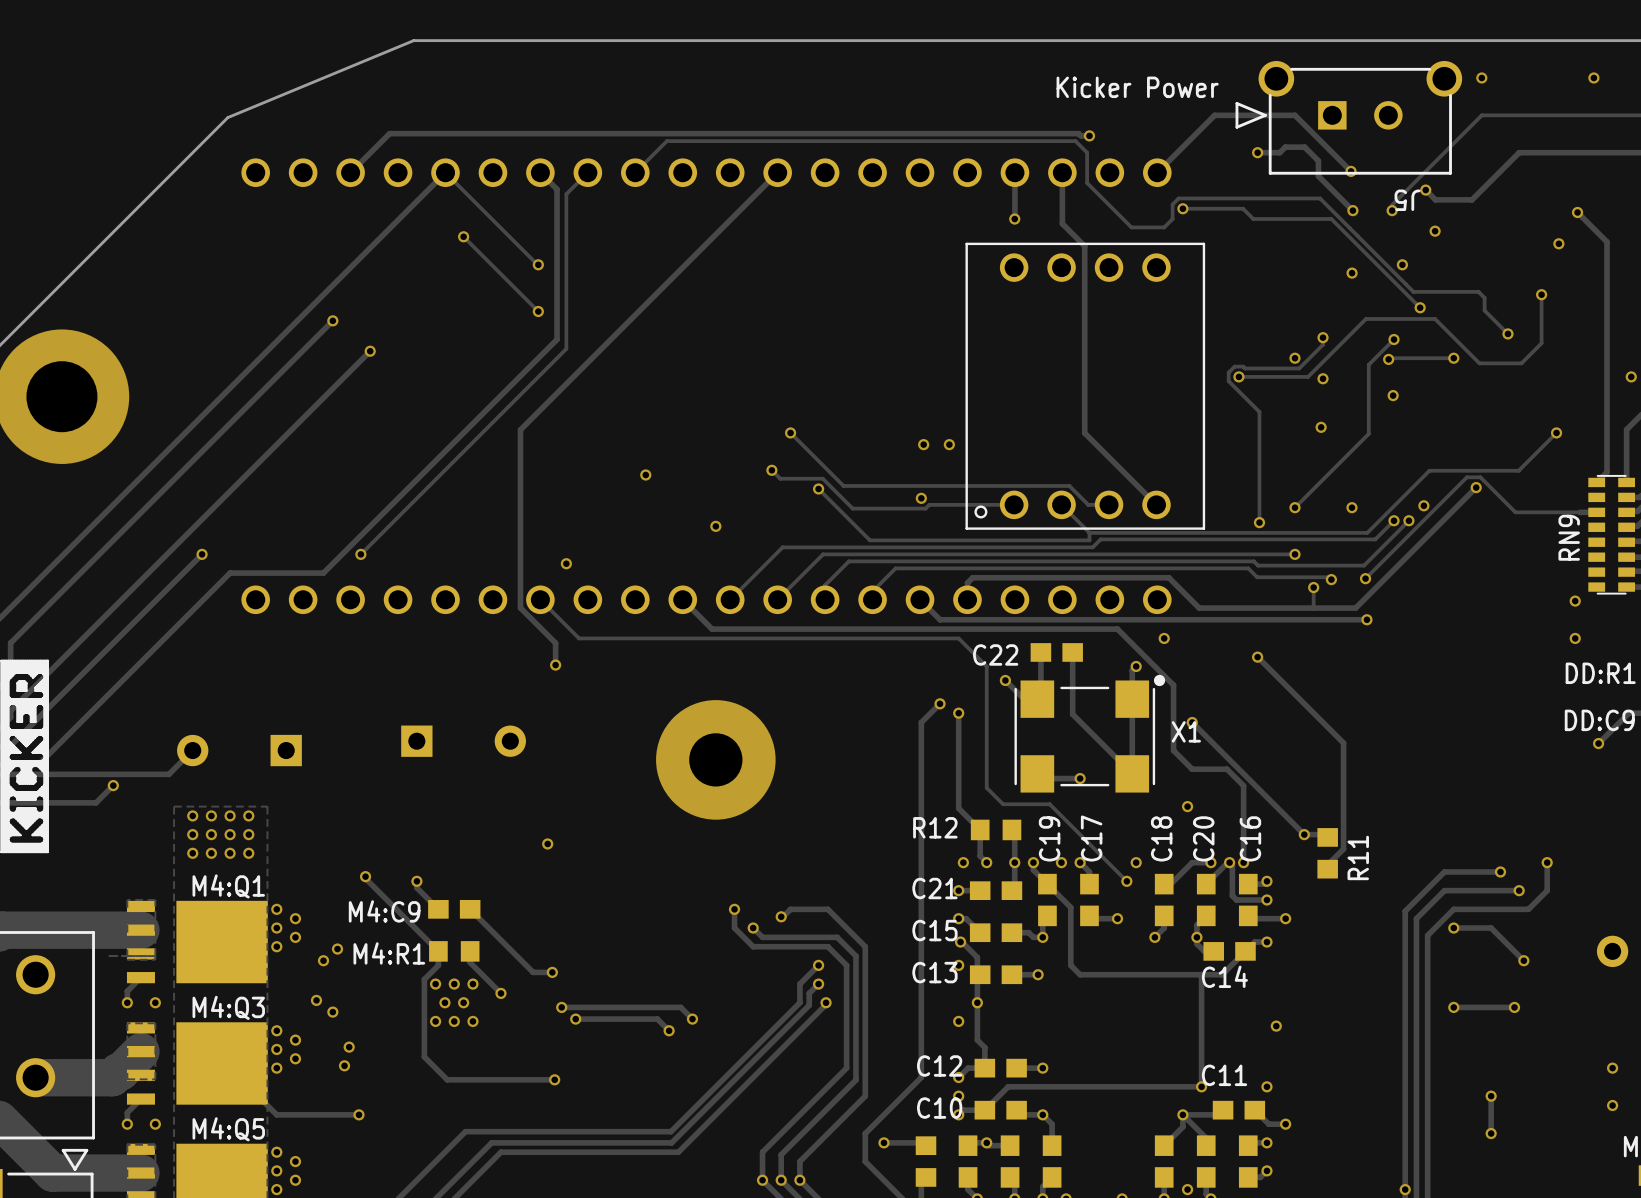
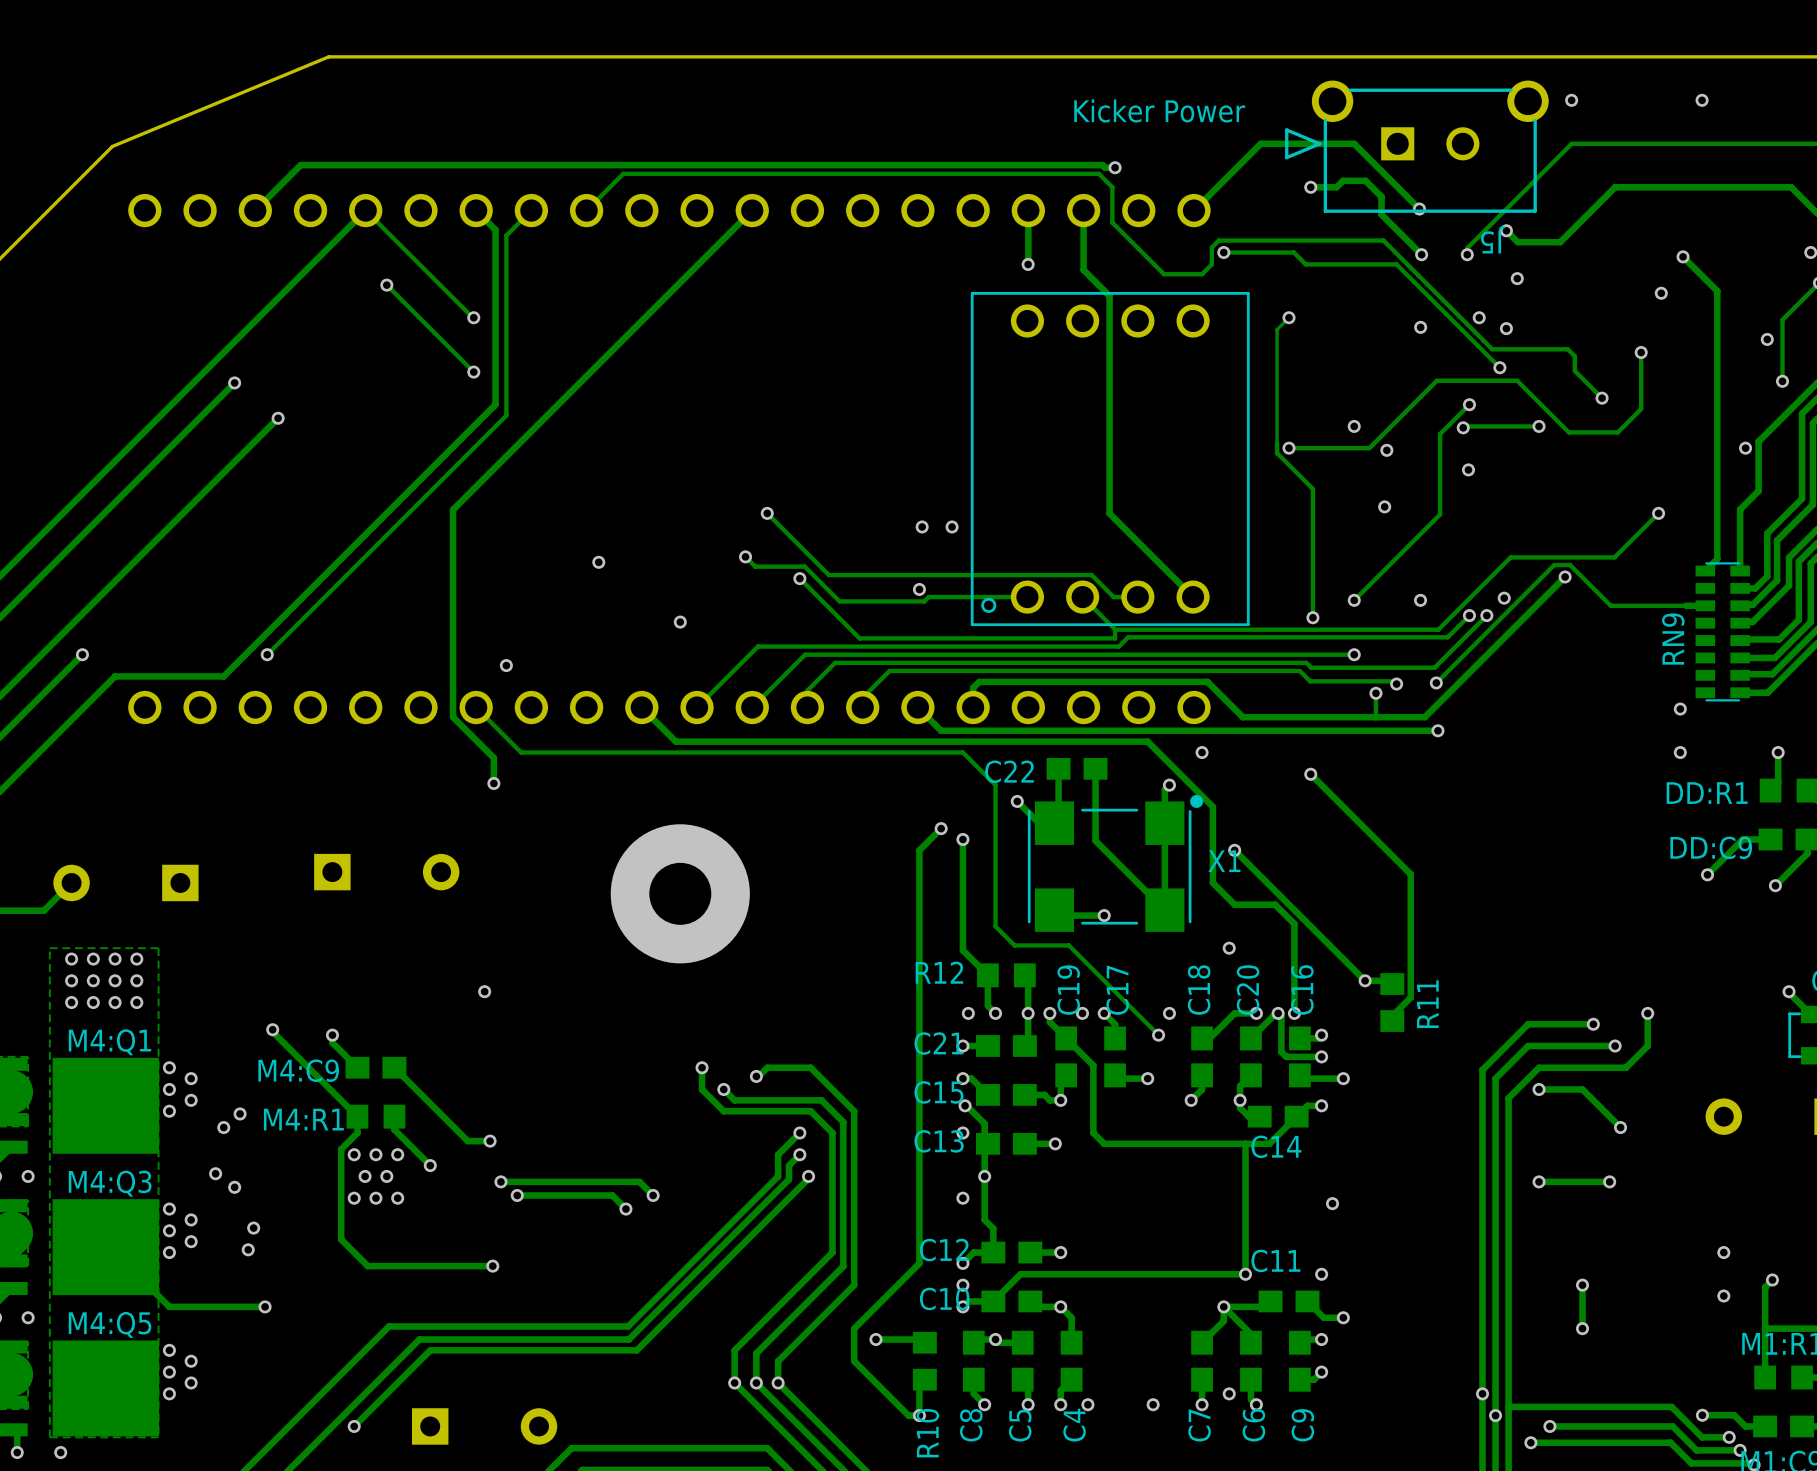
via: none -> (1289, 317)
via: none -> (1506, 328)
track: (1323, 337) (1323, 344) (1299, 368) (1245, 368) (1243, 366) (1234, 366) (1228, 372) -> (1289, 317) (1277, 329) (1277, 443)
via: (1323, 337) -> none

